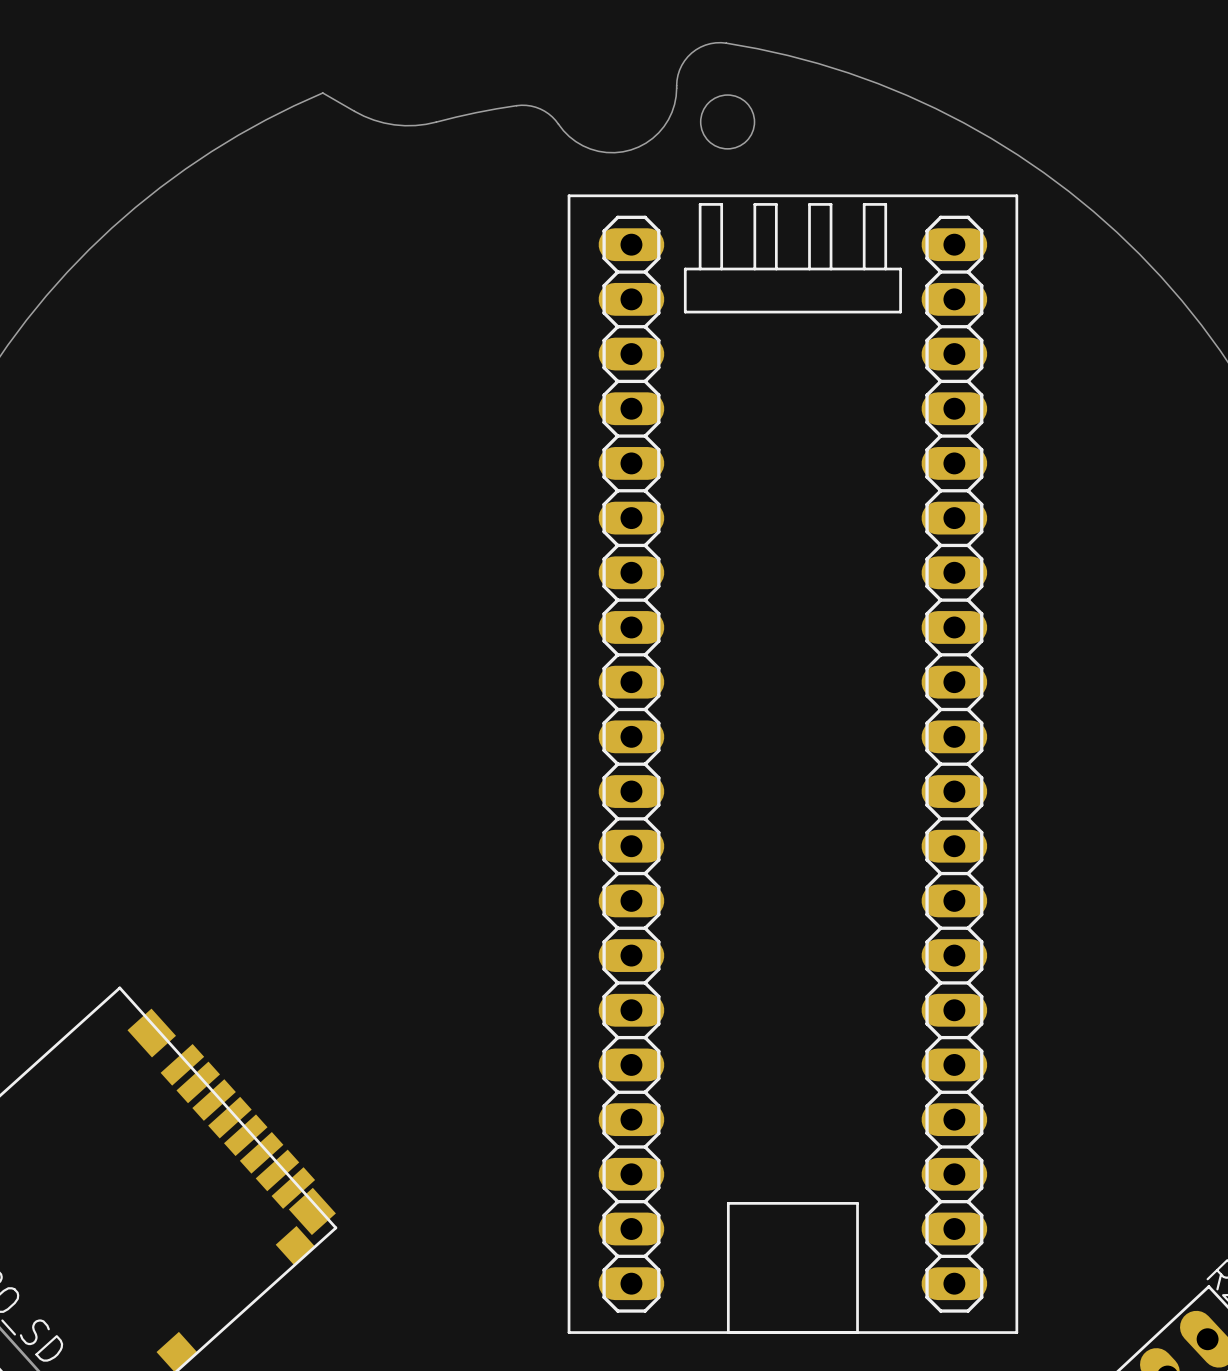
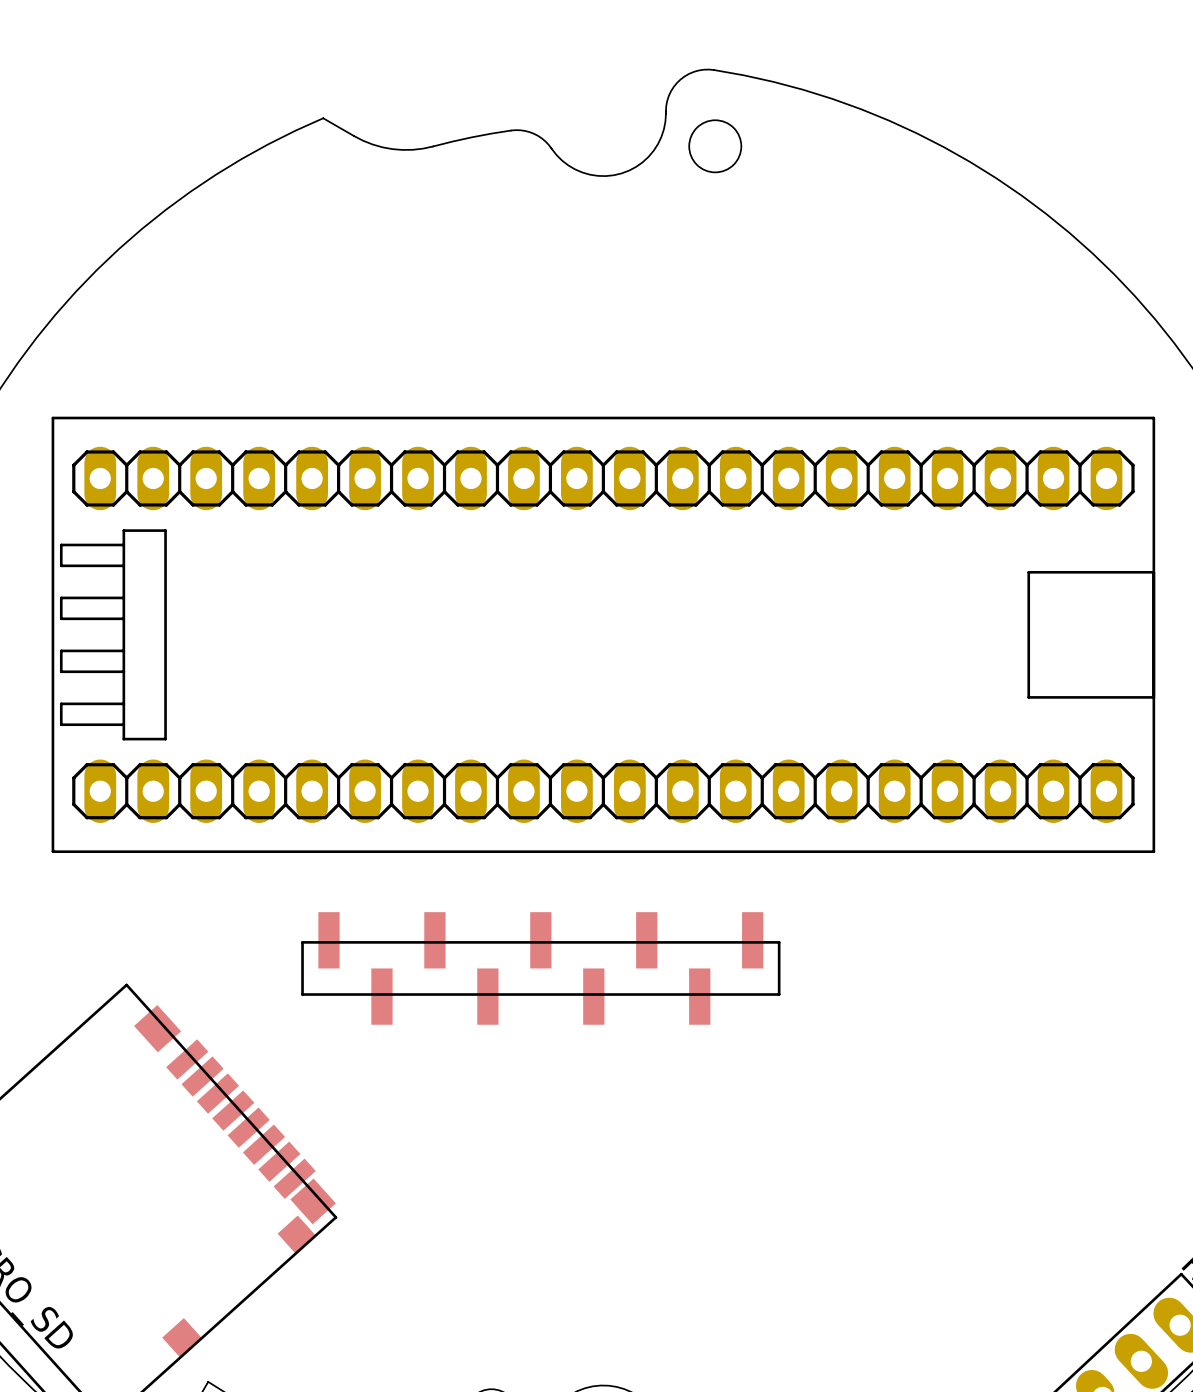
part rotation: 0° (792, 764) -> 90° counterclockwise (603, 634)
part: none -> (540, 968)

